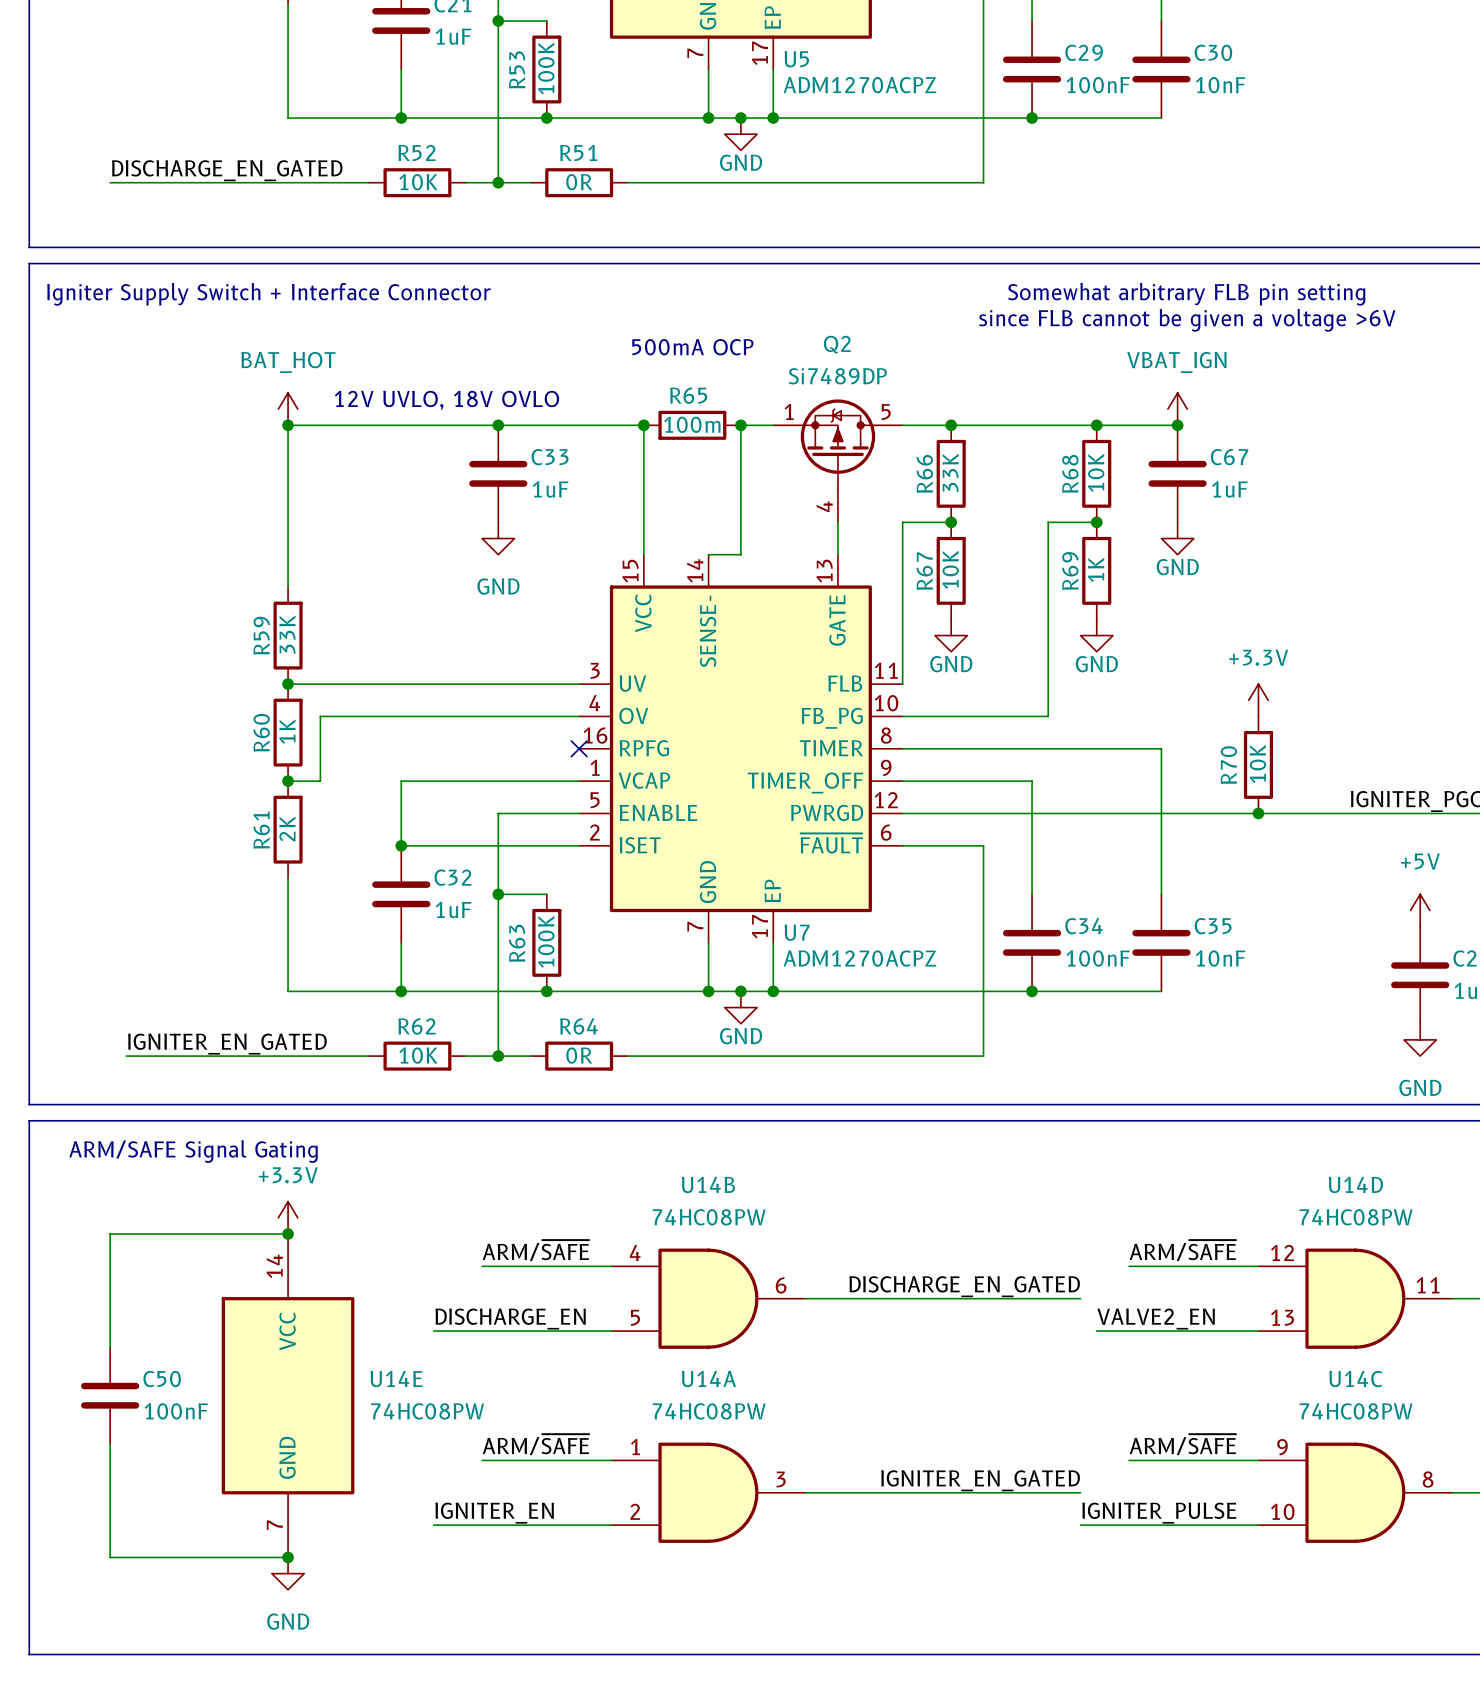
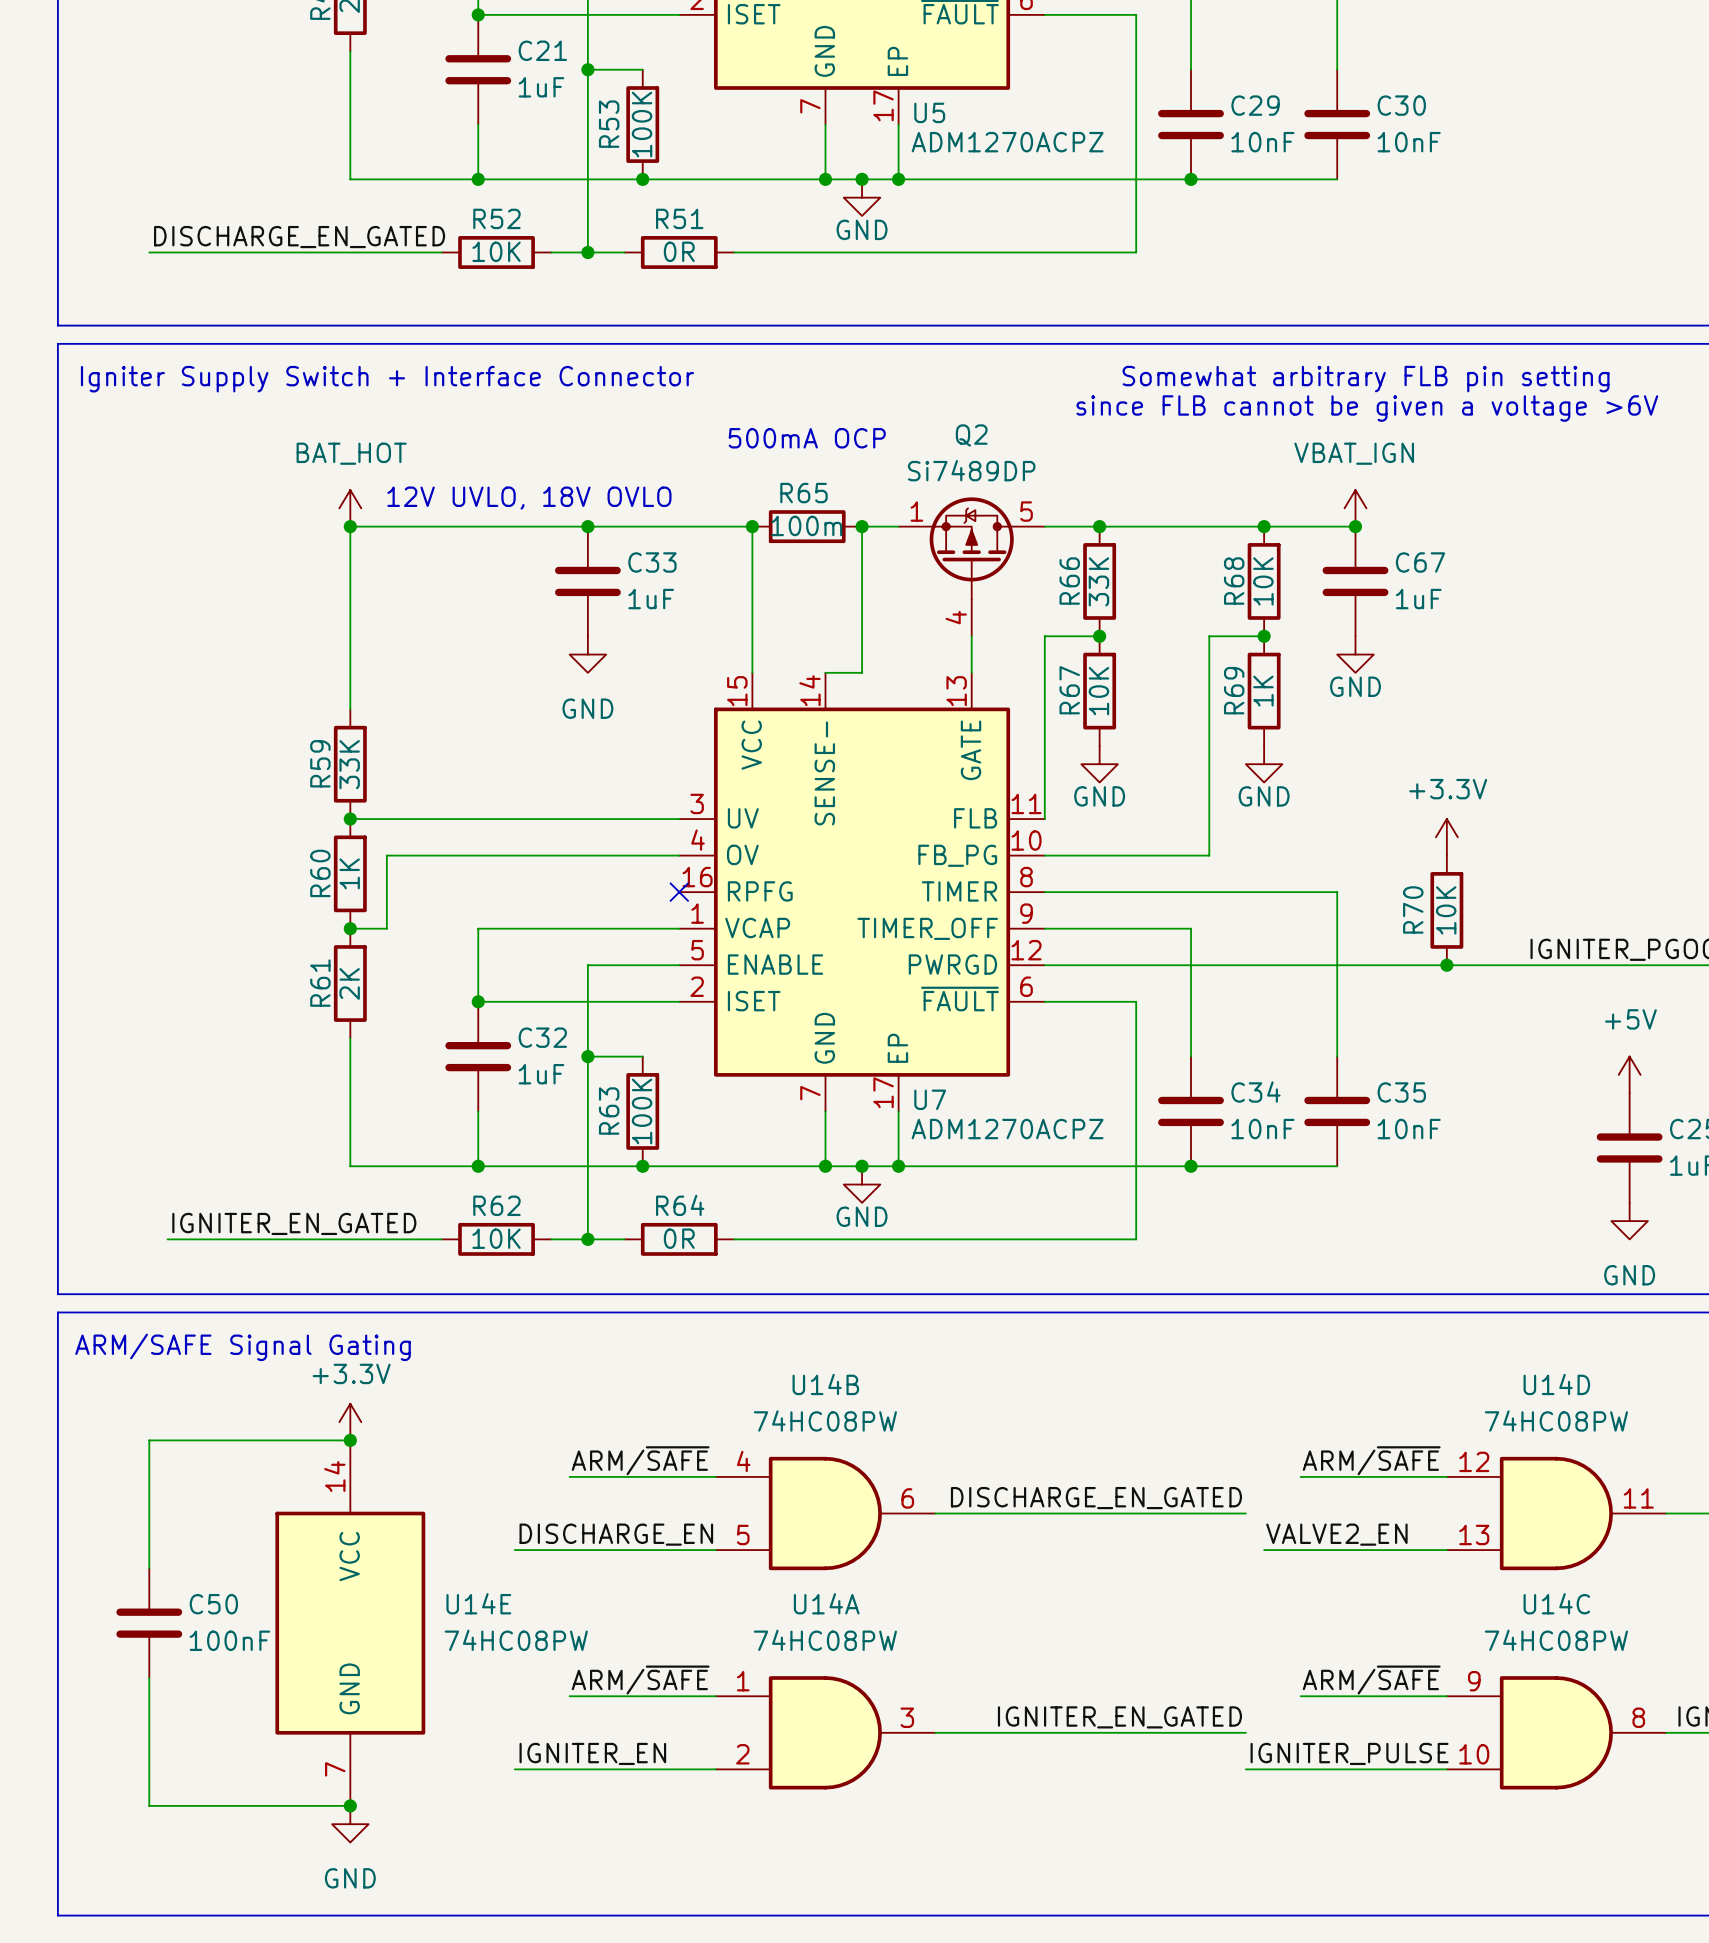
C29 value: 100nF (1098, 85) -> 10nF (1262, 142)
C34 value: 100nF (1098, 958) -> 10nF (1262, 1129)

